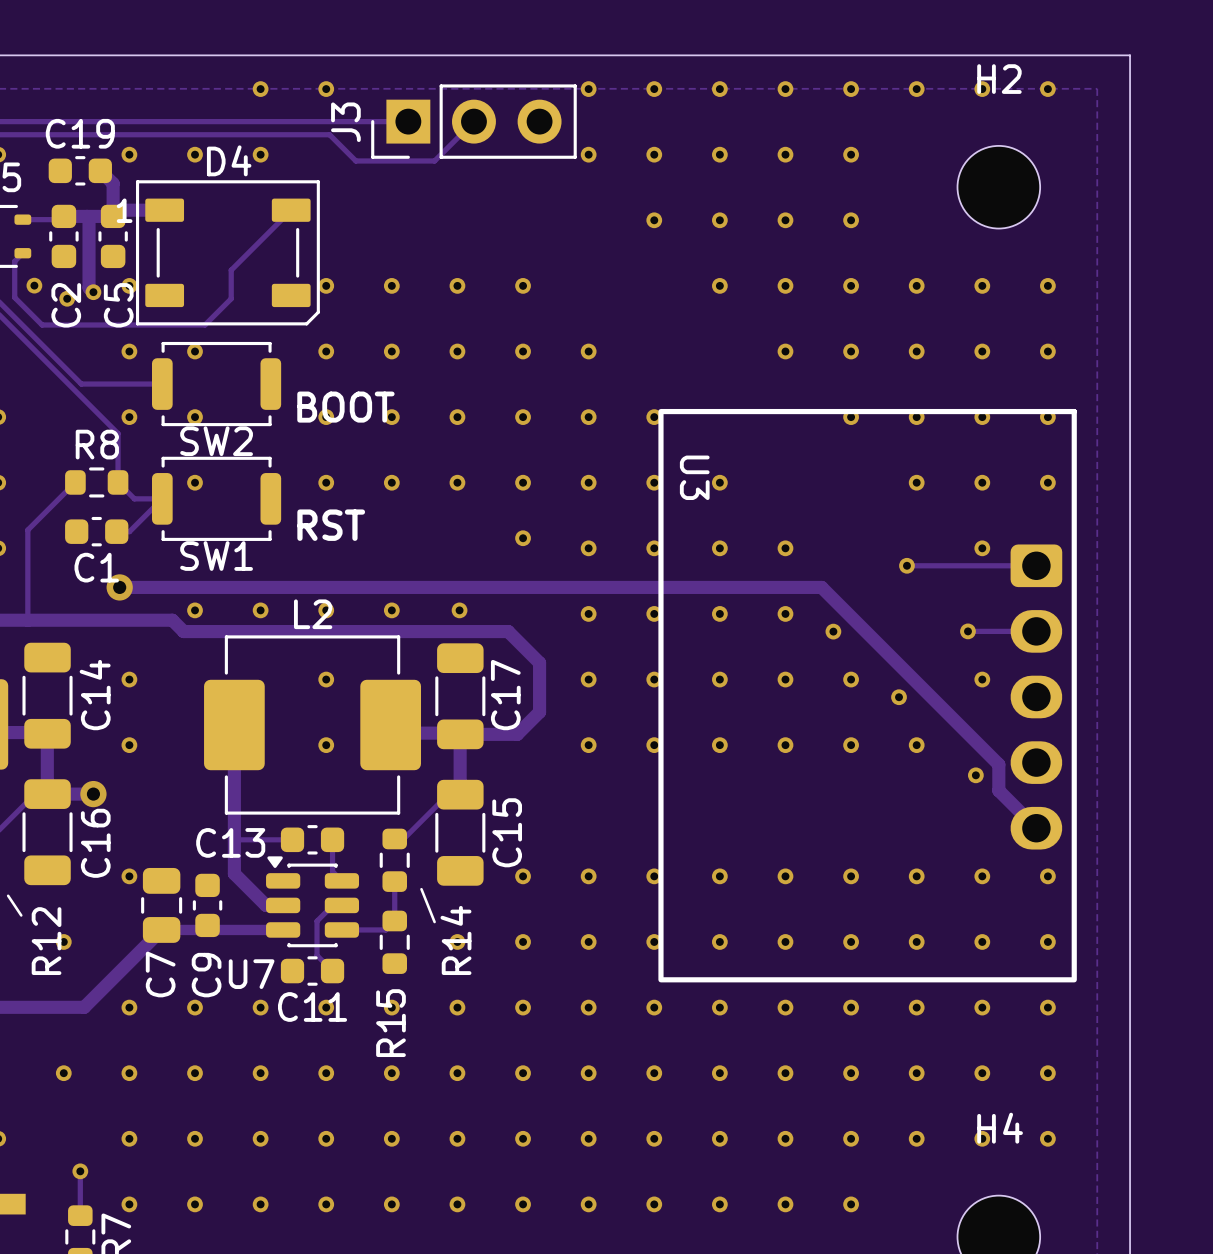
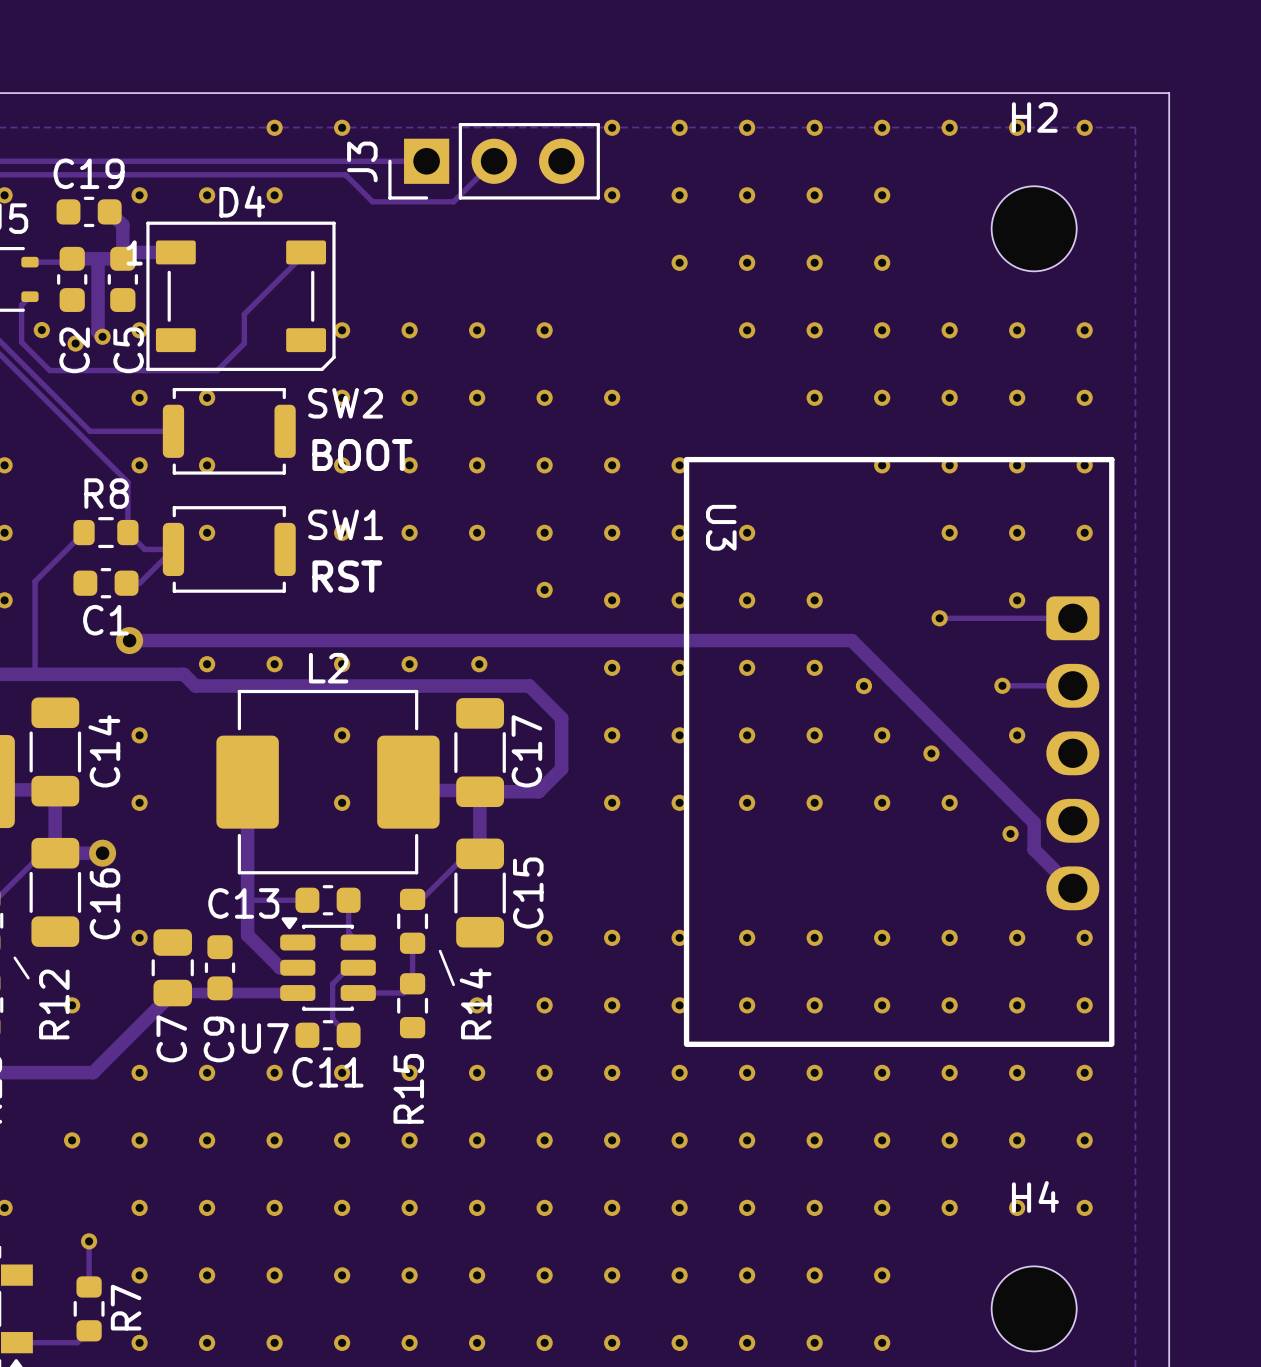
SW2 name position: SW2 (216, 441) -> SW2 (345, 403)
SW1 name position: SW1 (216, 556) -> SW1 (345, 524)

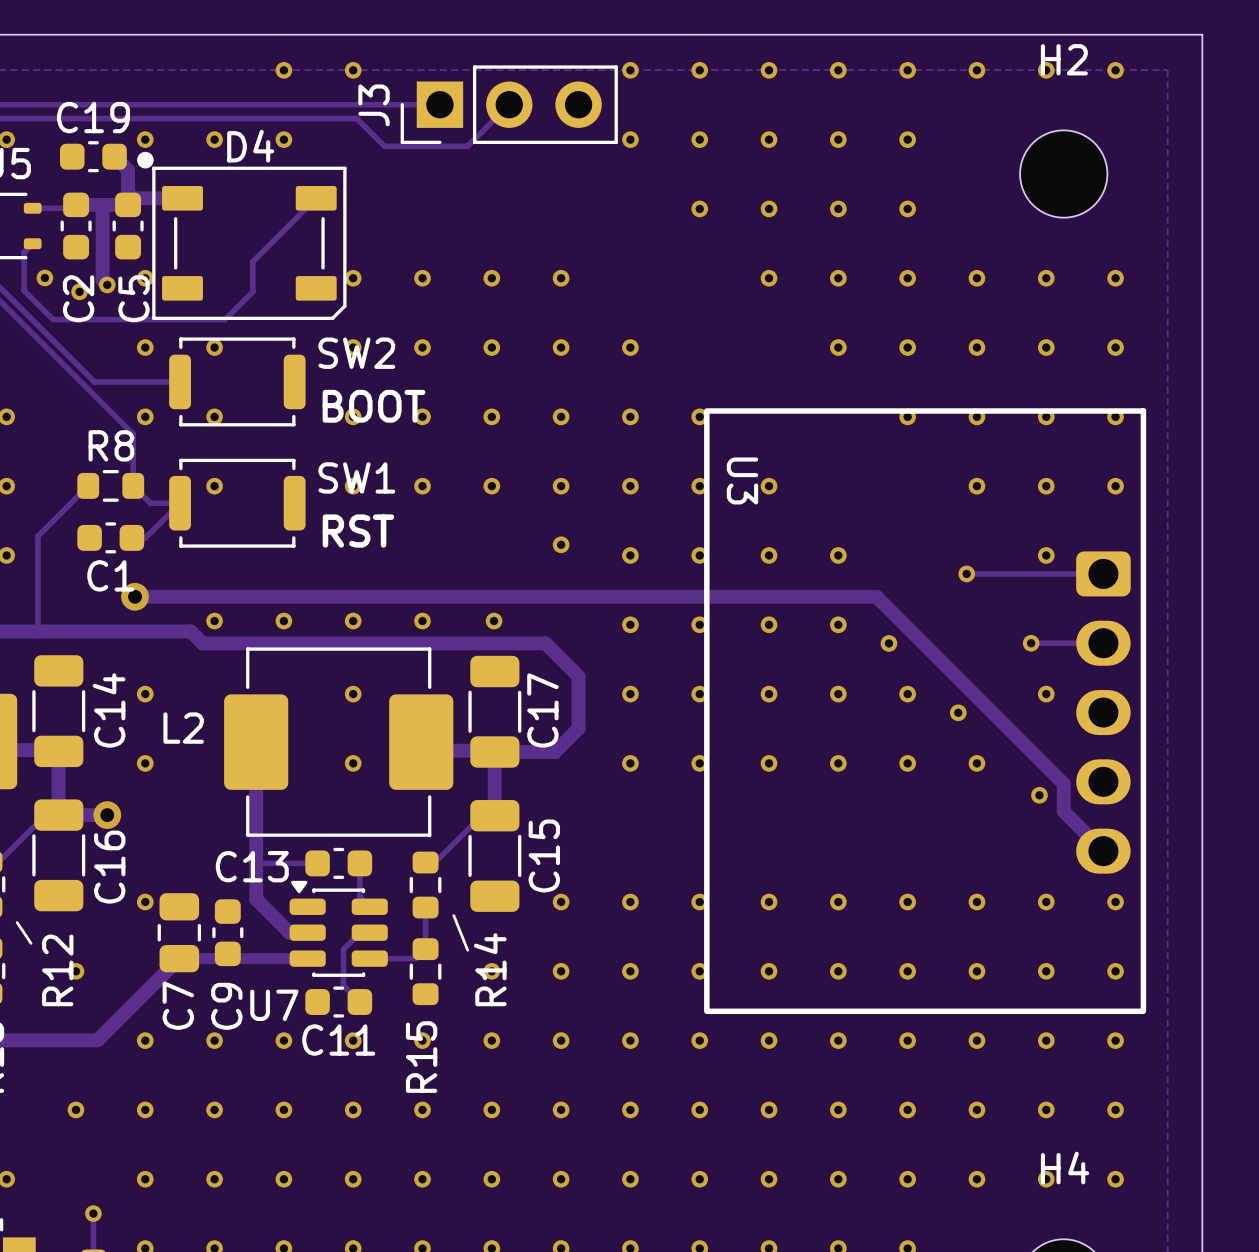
D4 footprint: [146, 221, 336, 371] -> [137, 151, 347, 321]
L2 name position: L2 (328, 668) -> L2 (183, 728)

